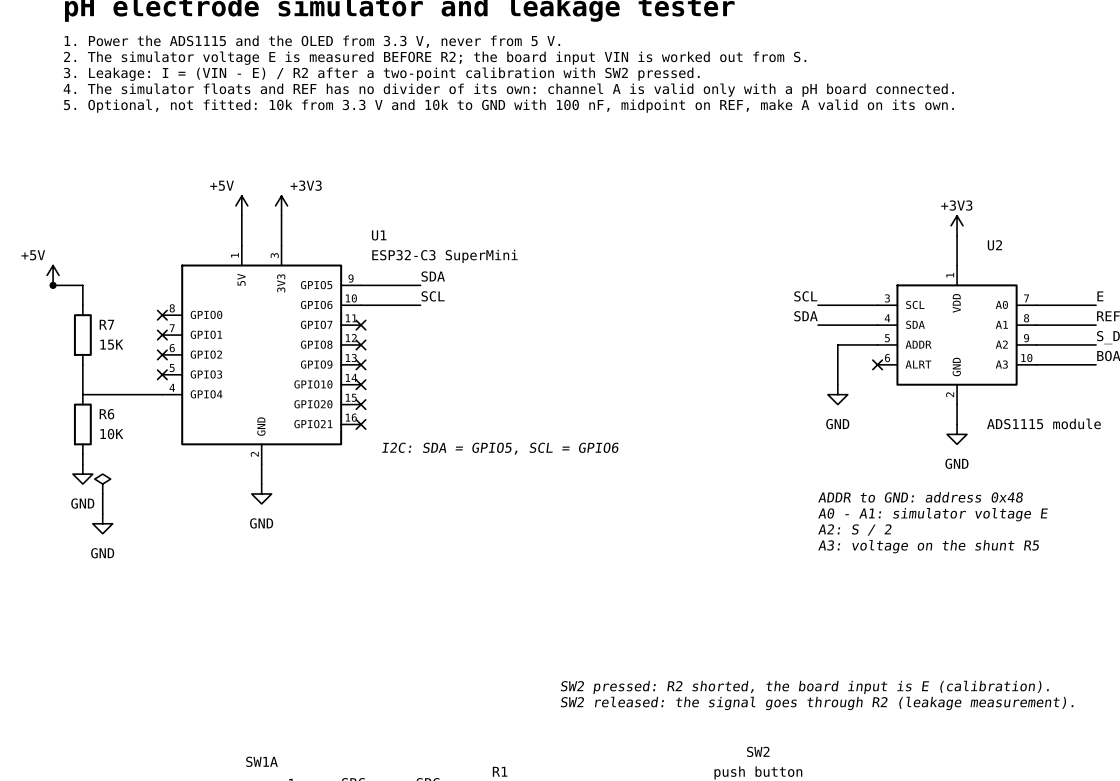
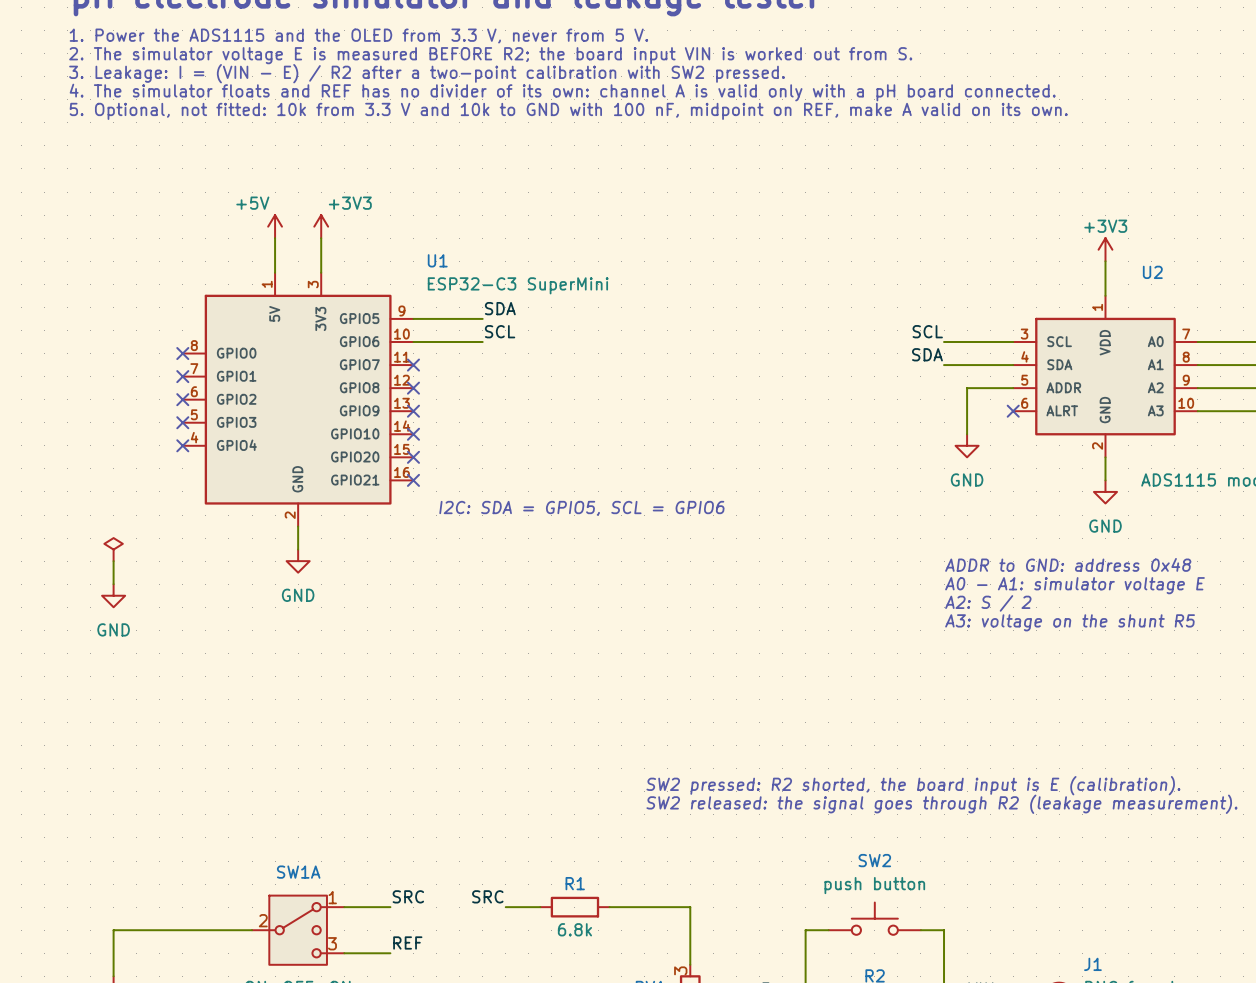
power symbol: +5V (53, 275) -> none
wire: (53, 285) (82, 285) (82, 305) -> none
junction: (53, 285) -> none
R7: 15K (82, 335) -> none
wire: (82, 364) (82, 394) (162, 394) -> none
no-connect mark: none -> (182, 445)
R6: 10K (82, 424) -> none
wire: (82, 454) (82, 464) -> none
power symbol: GND (82, 474) -> none

